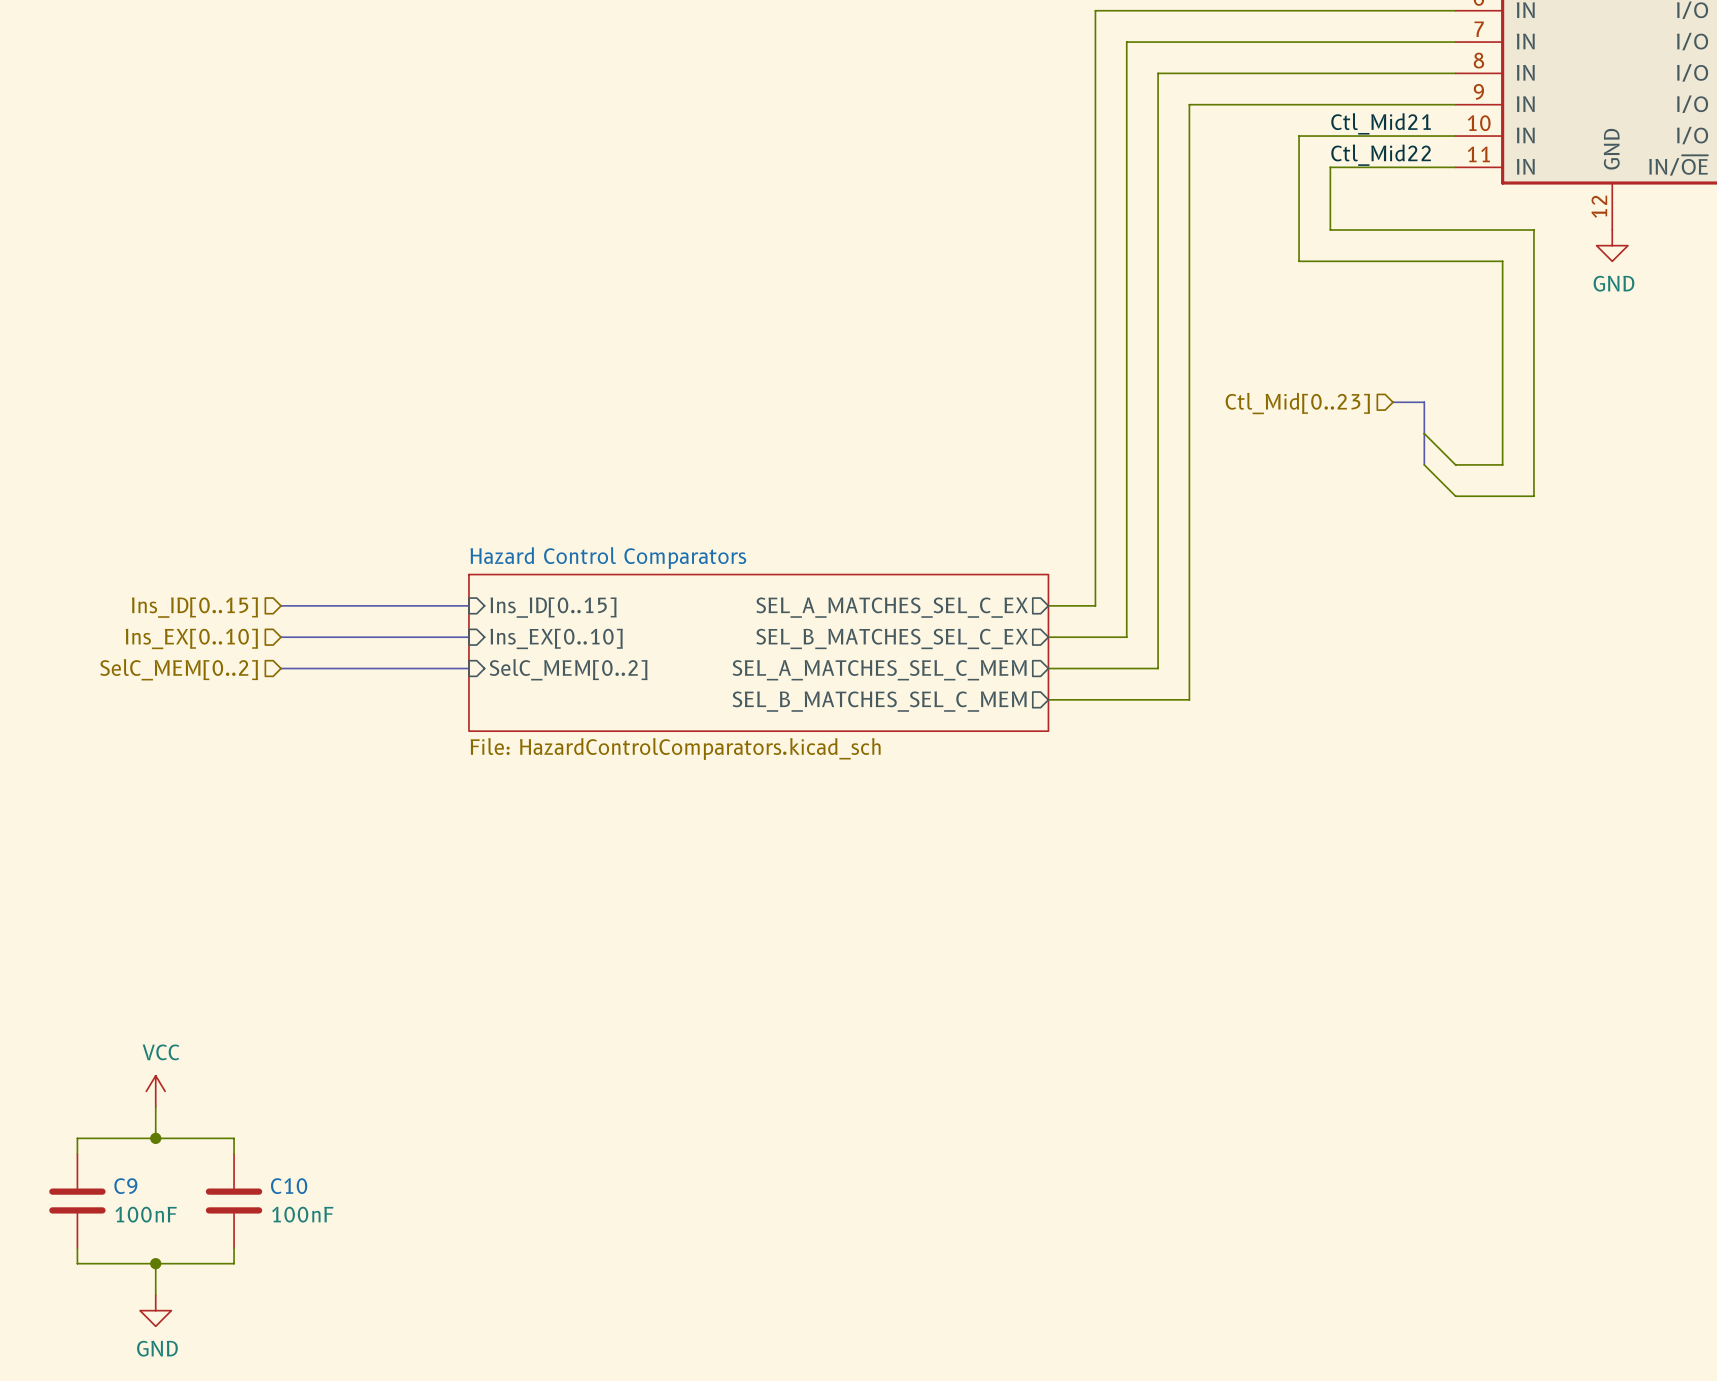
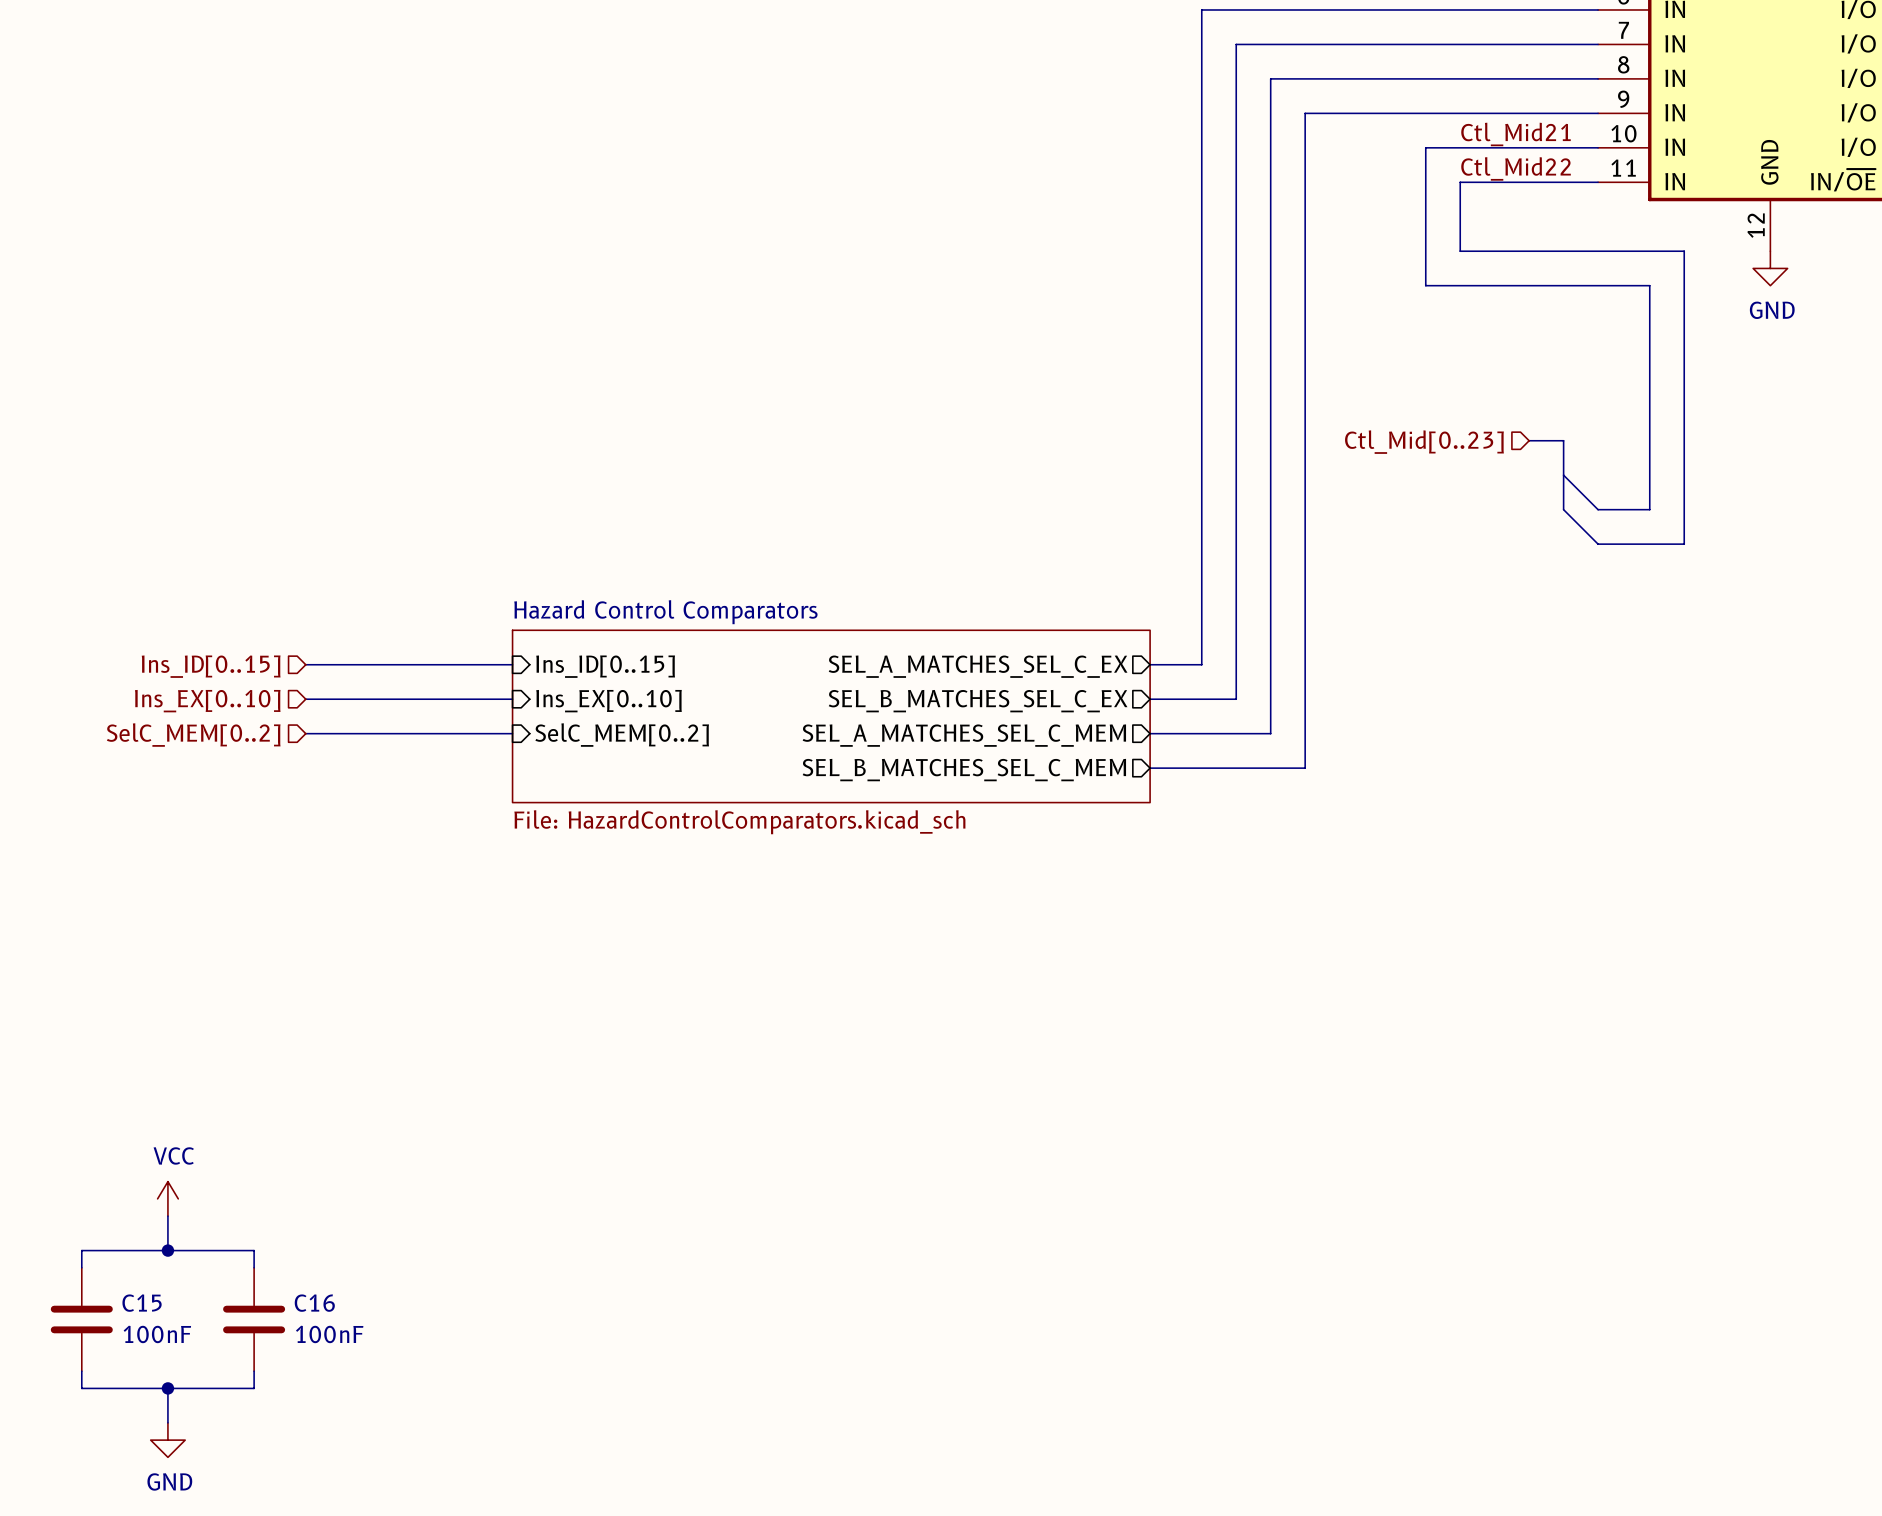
C9 name: C9 (125, 1186) -> C15 (142, 1303)
C10 name: C10 (289, 1186) -> C16 (314, 1303)

